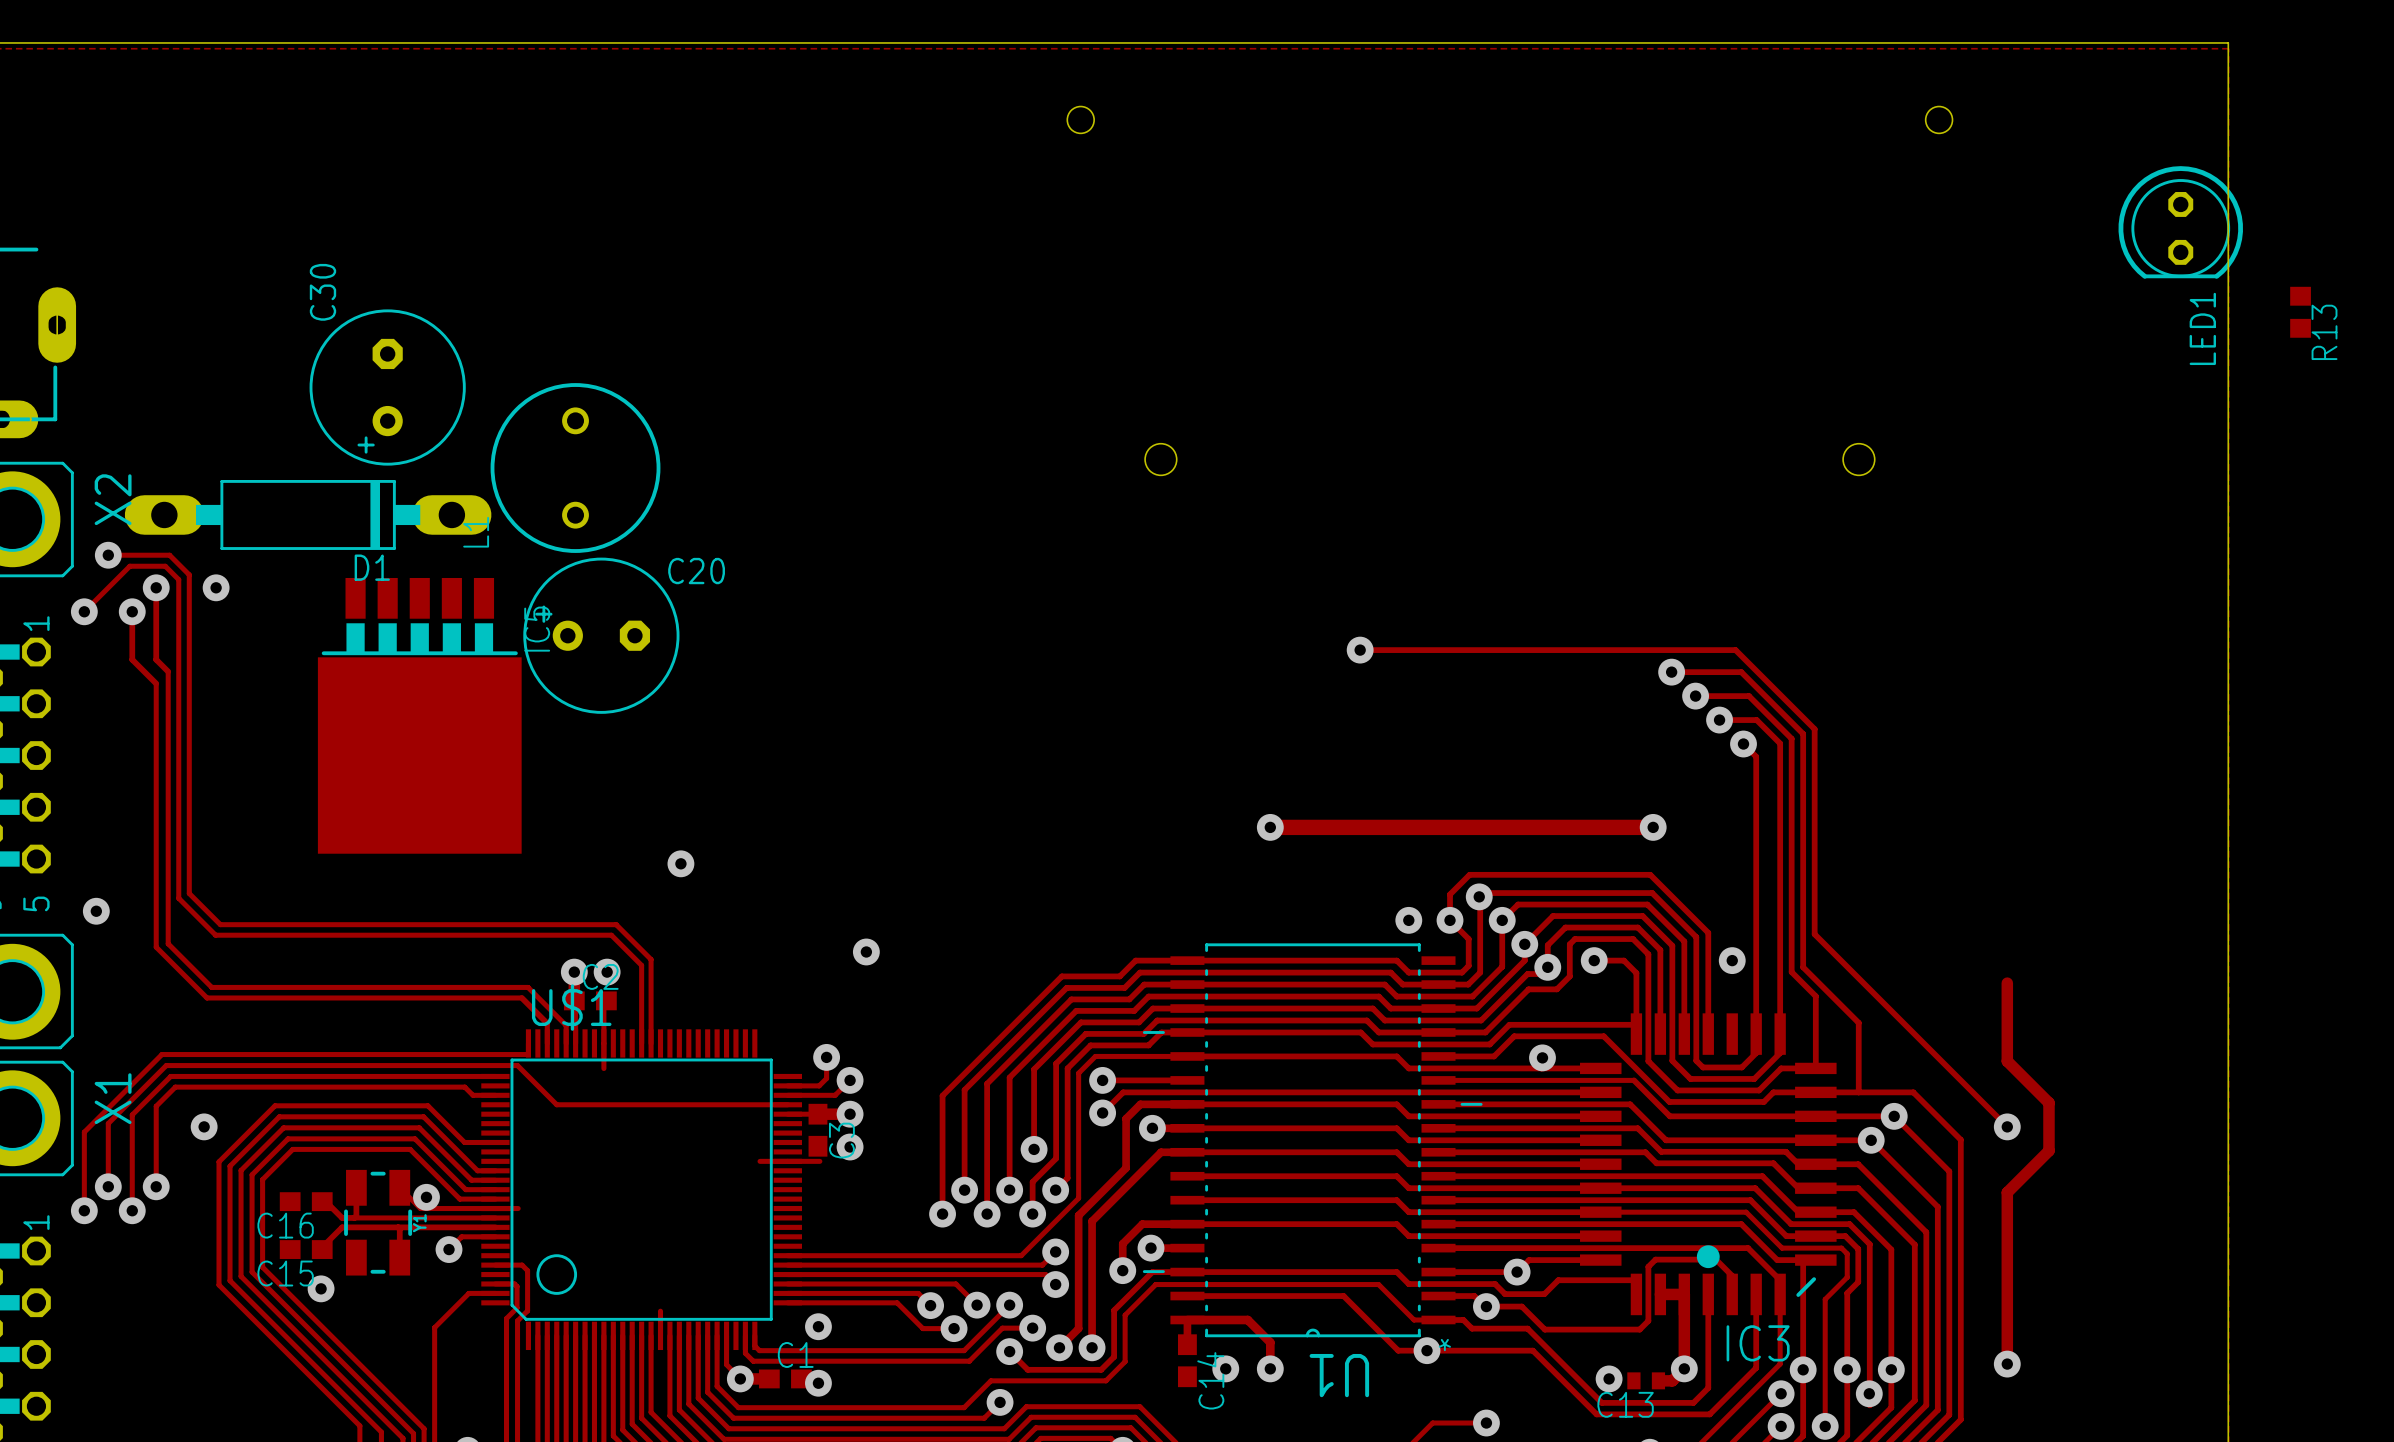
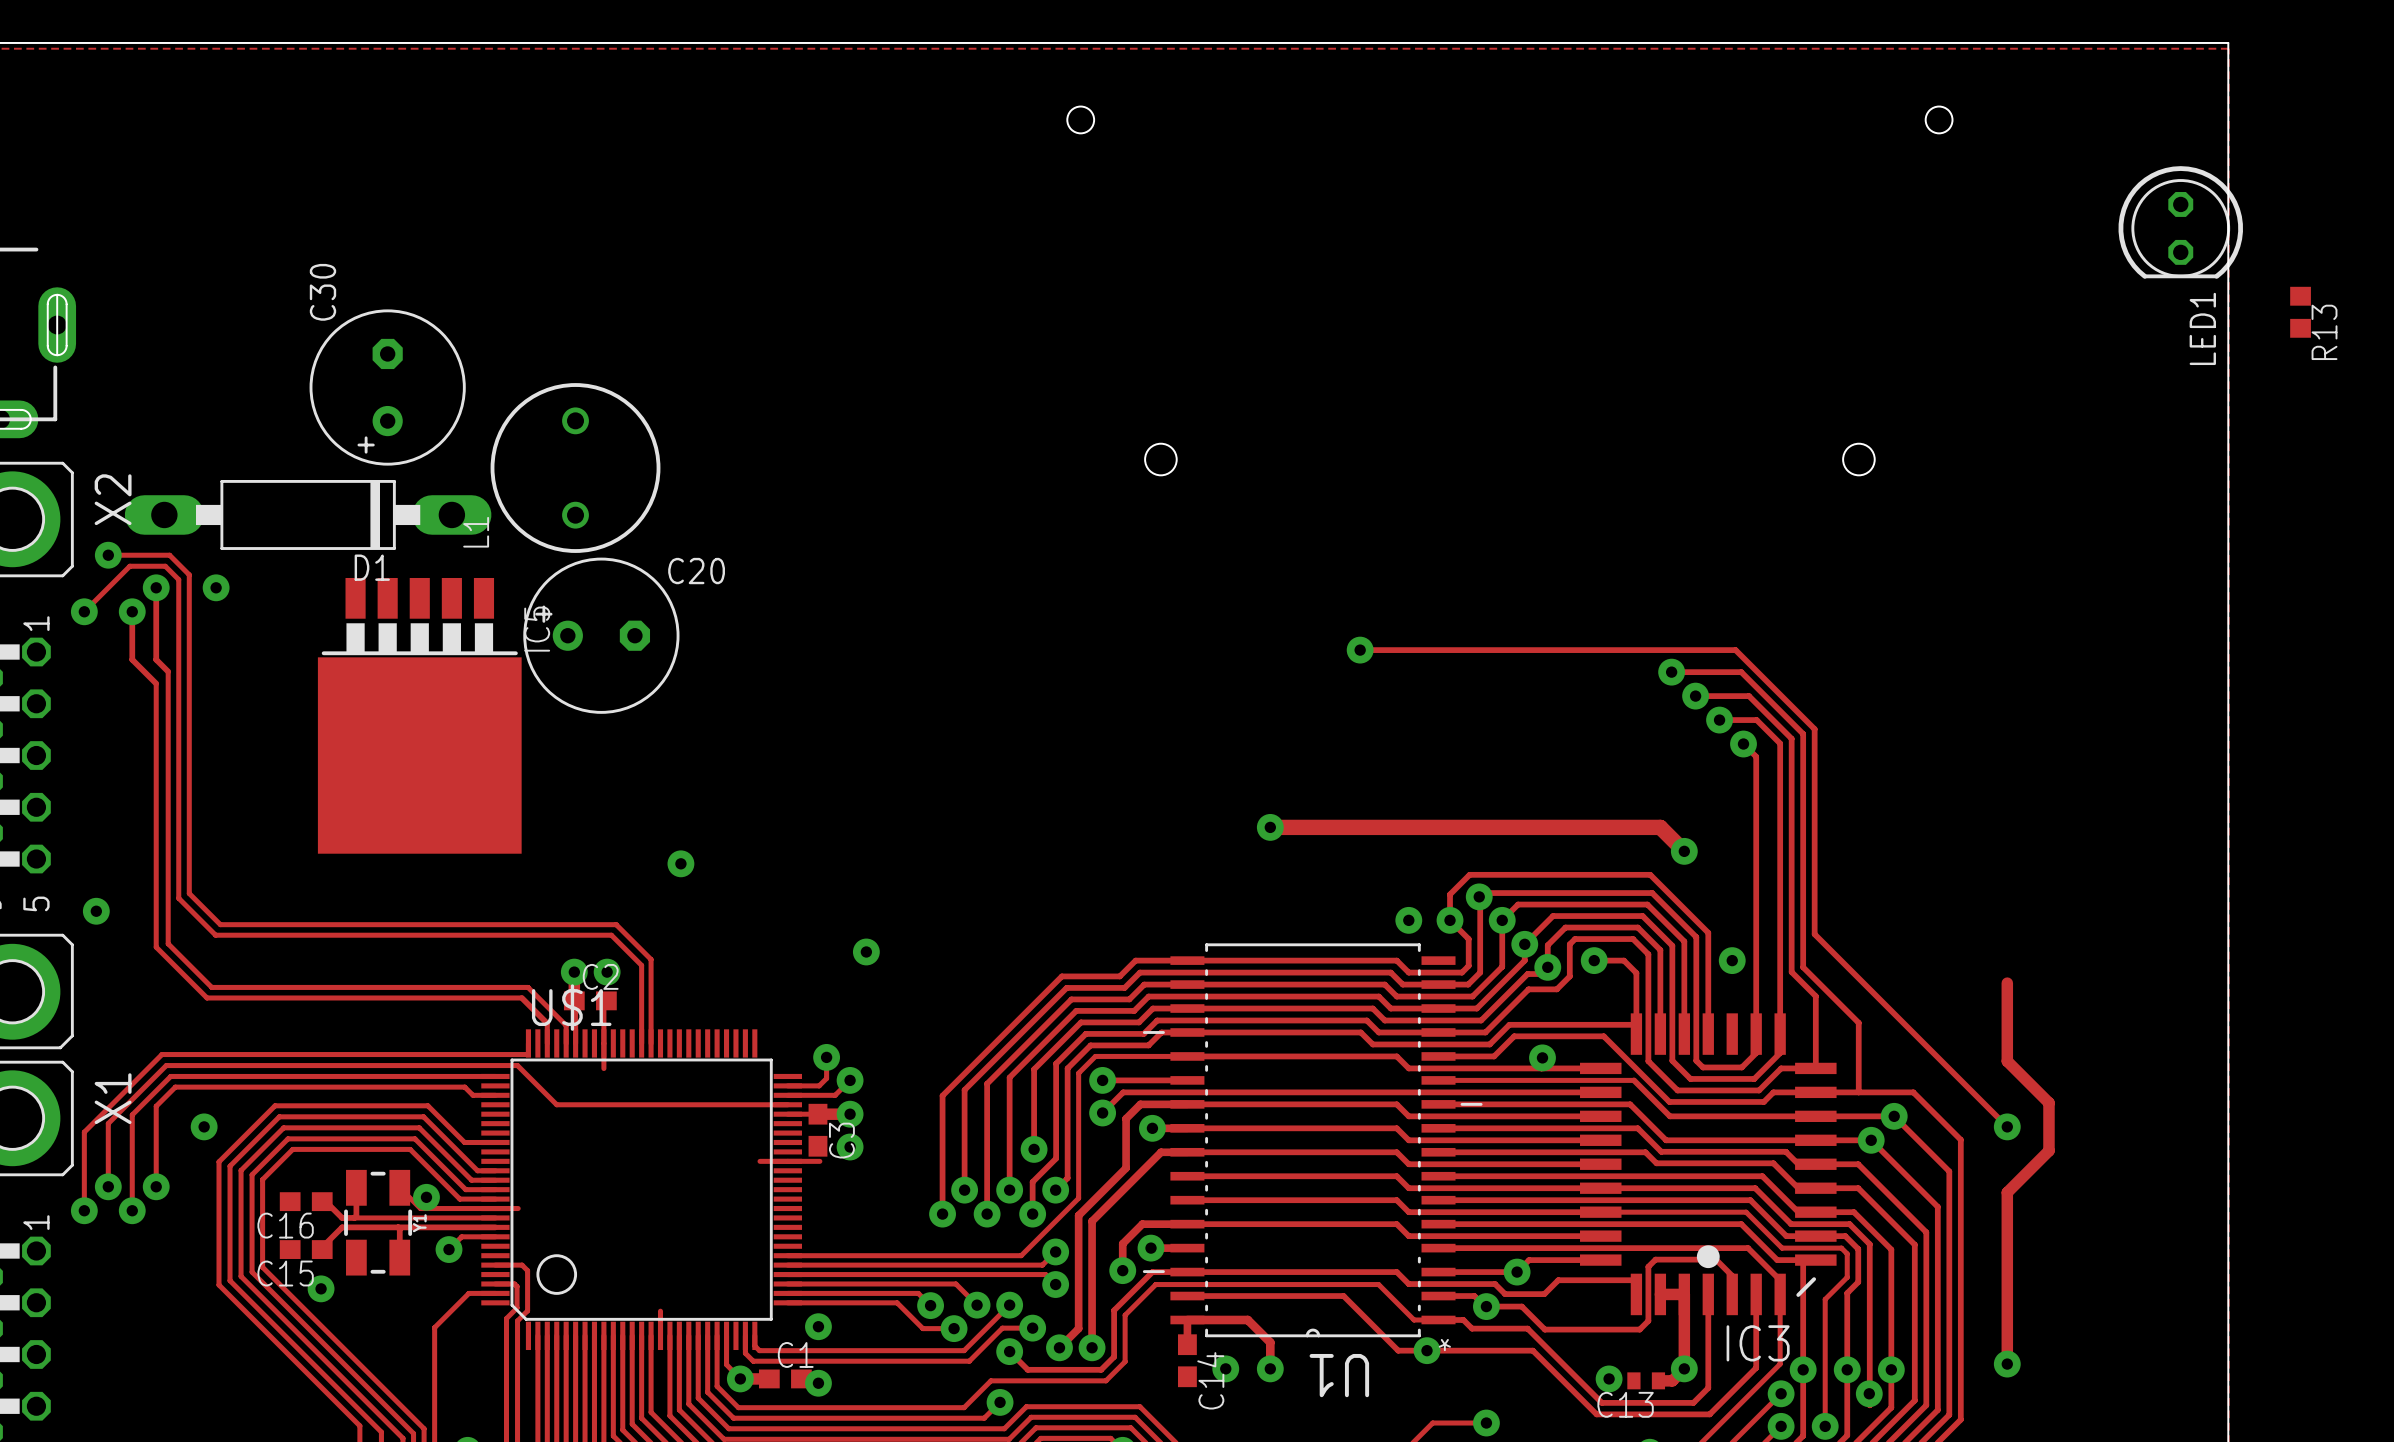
track: none -> (1653, 827) (1660, 827) (1684, 851)
via position: (1653, 827) -> (1684, 851)

